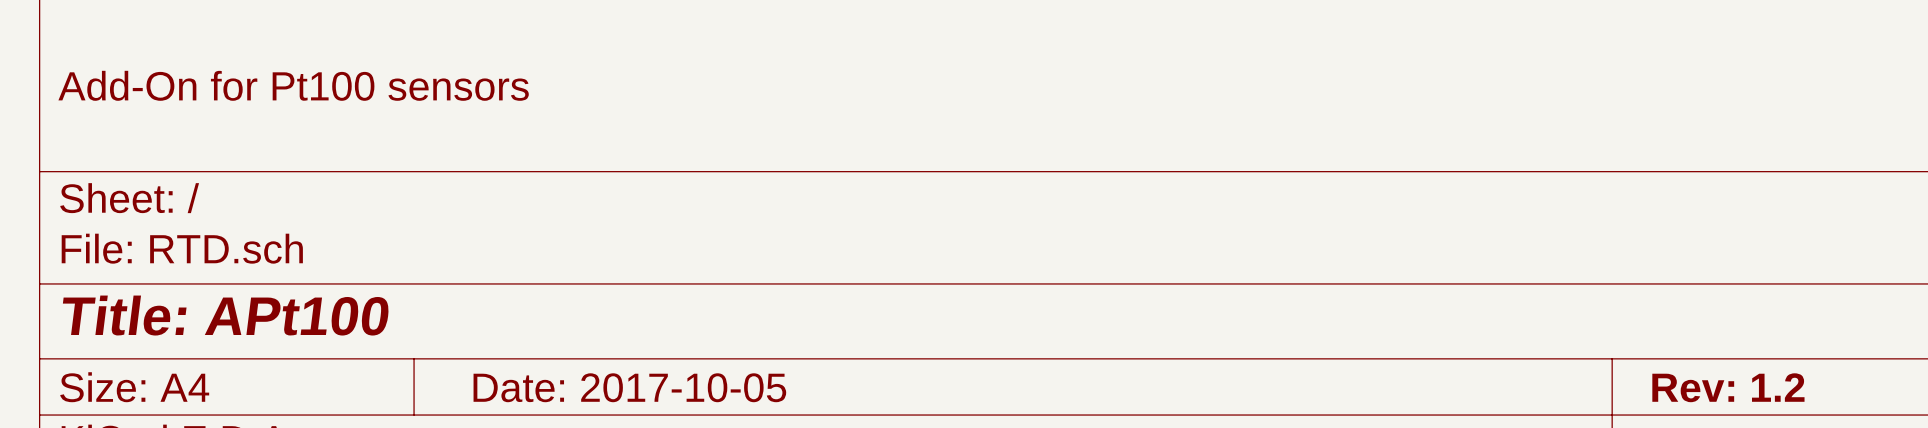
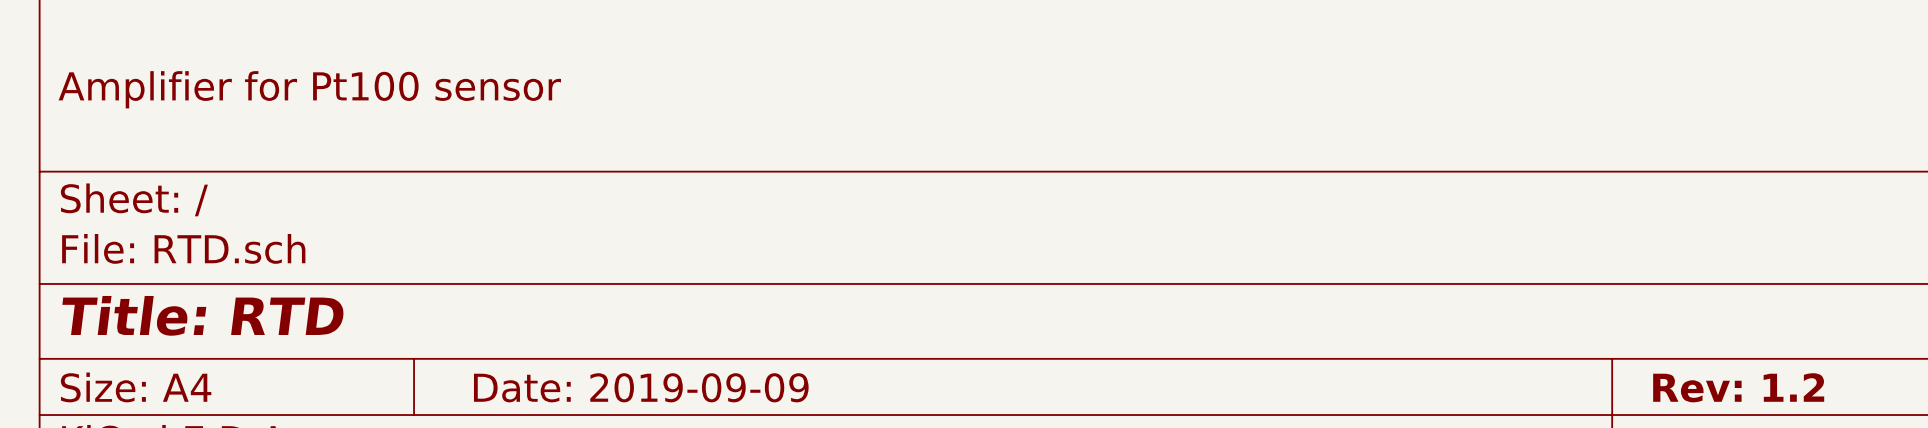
title block: Add-On for Pt100 sensors (293, 85) -> Amplifier for Pt100 sensor (309, 89)
title block: Title: APt100 (226, 315) -> Title: RTD (203, 315)
title block: Date: 2017-10-05 (629, 387) -> Date: 2019-09-09 (641, 387)

